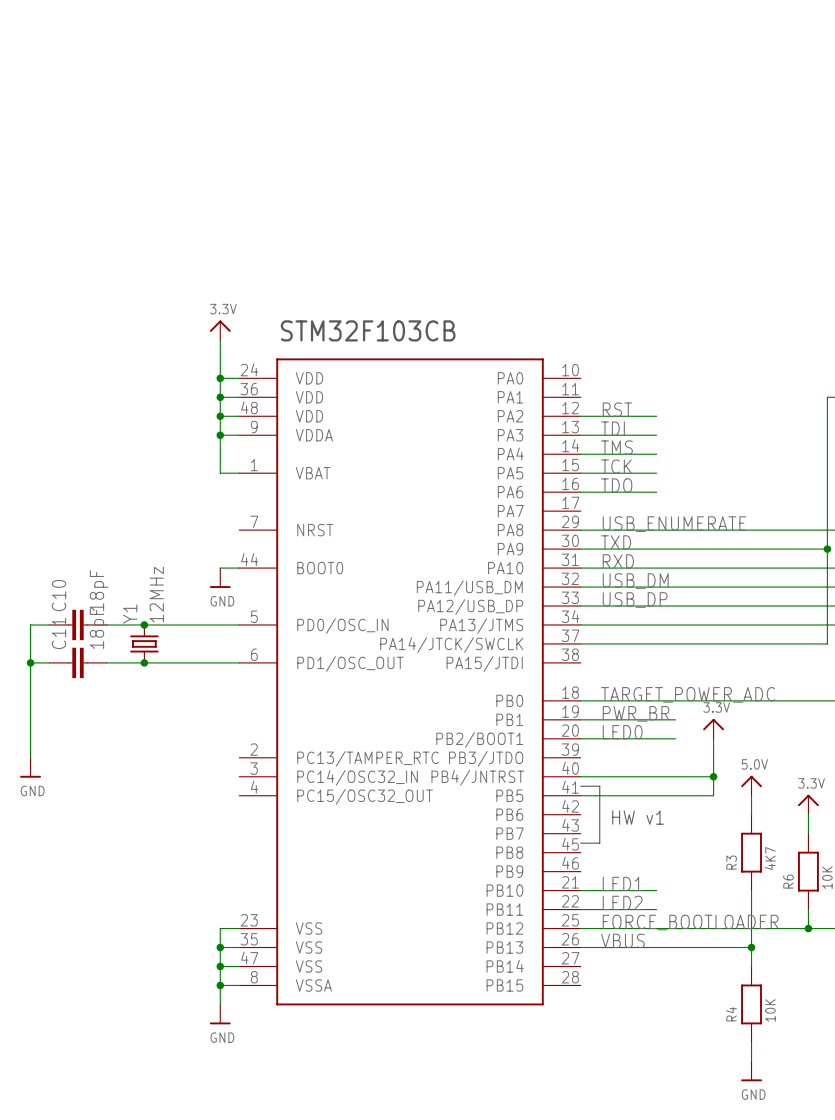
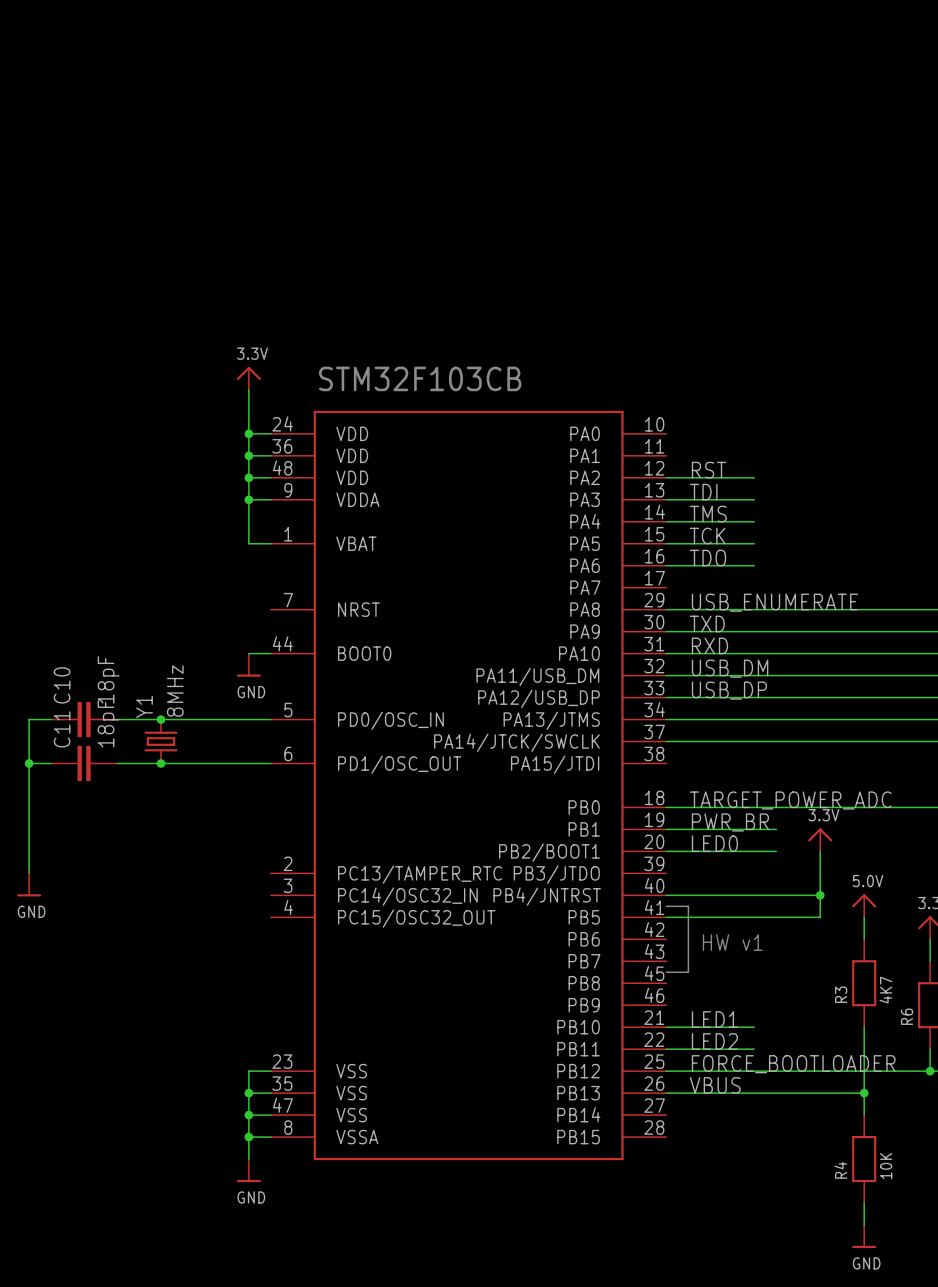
Y1 value: 12MHz (156, 594) -> 8MHz (175, 691)

